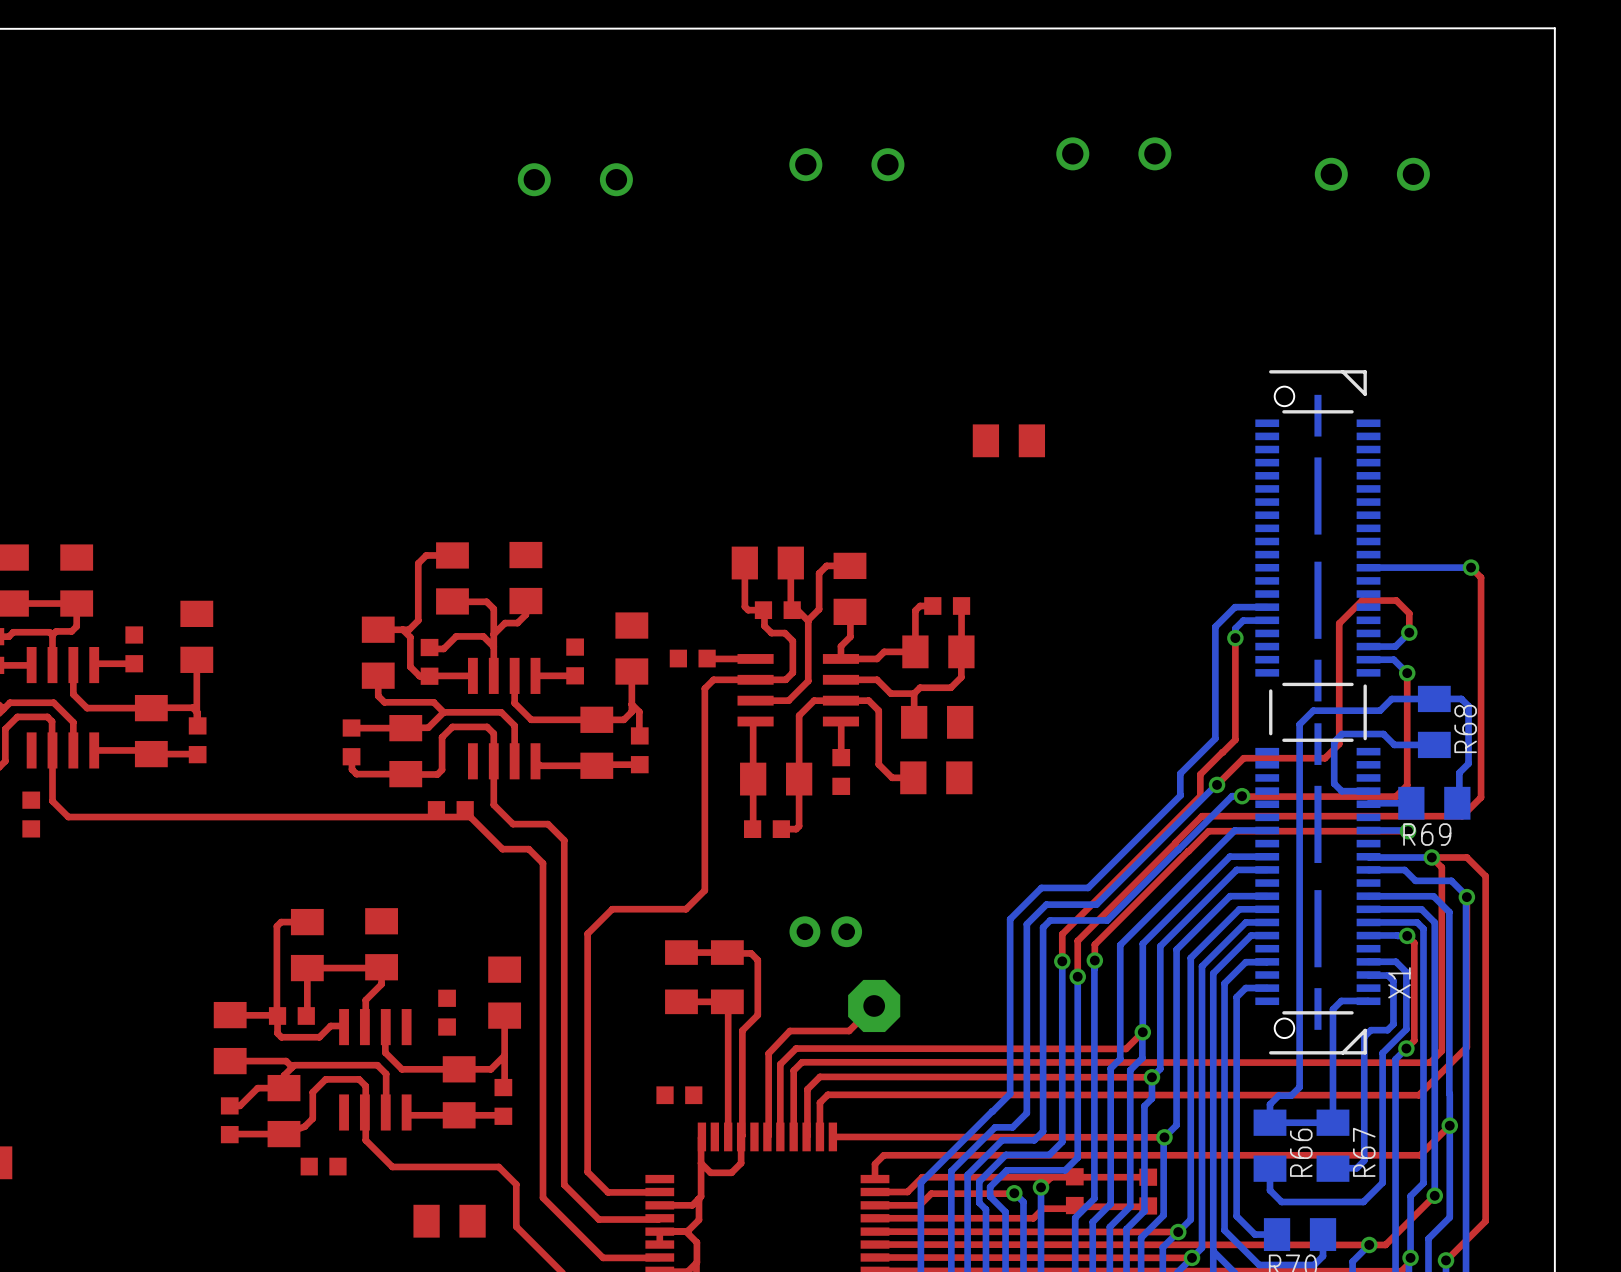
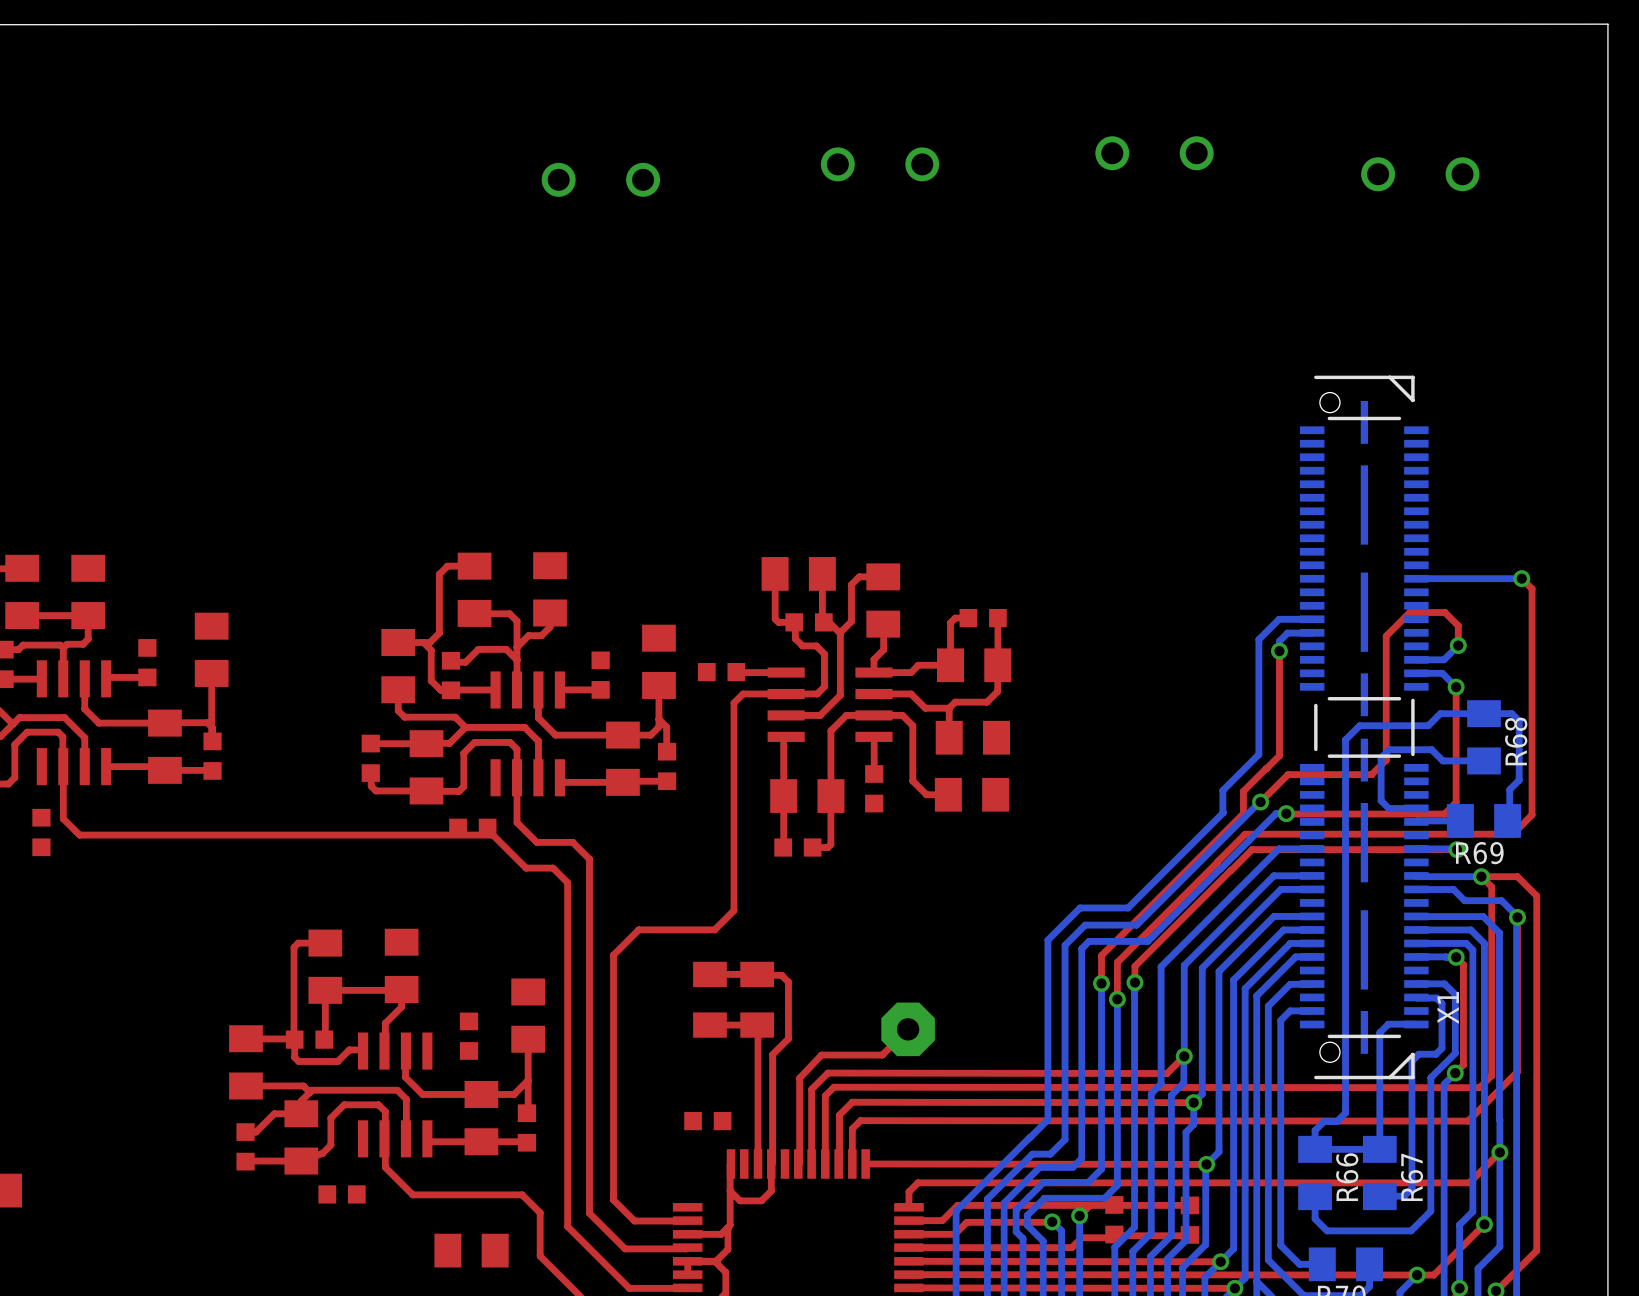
part: (1008, 440) -> none
part: (825, 931) -> none

